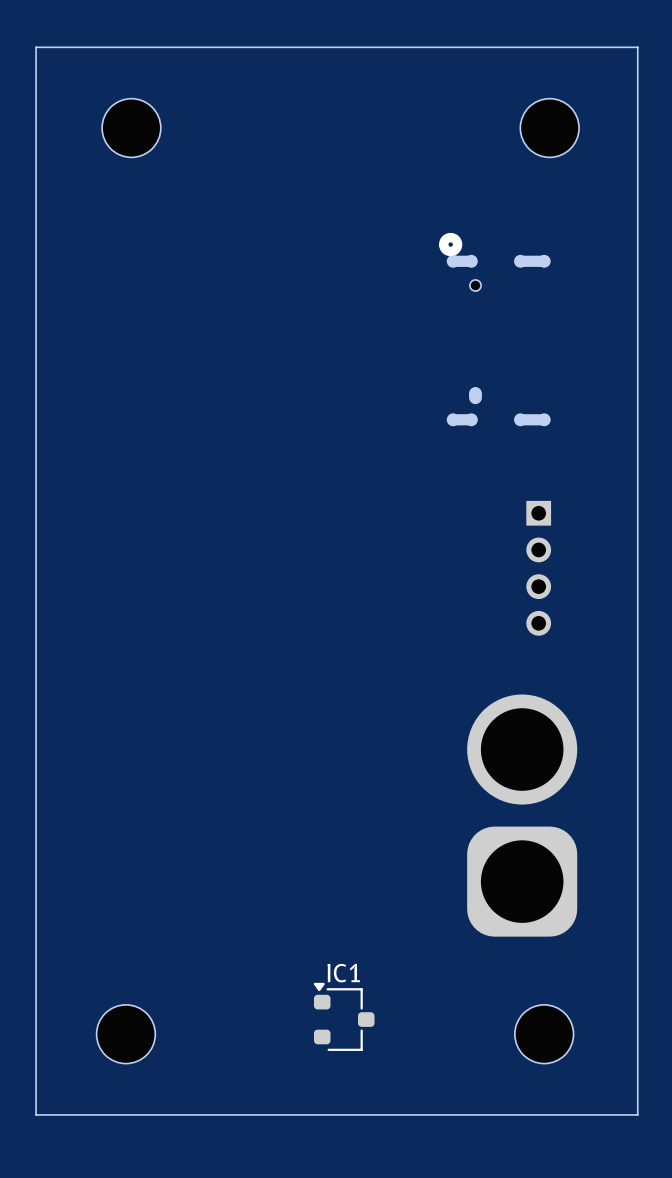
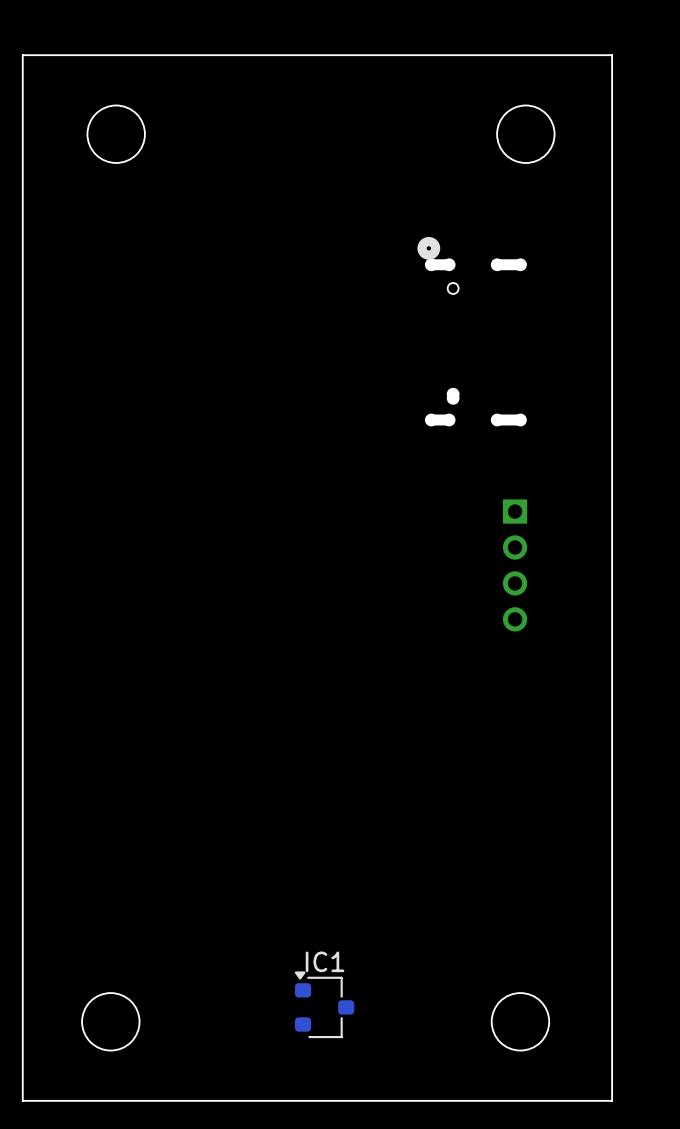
part: (522, 815) -> none

